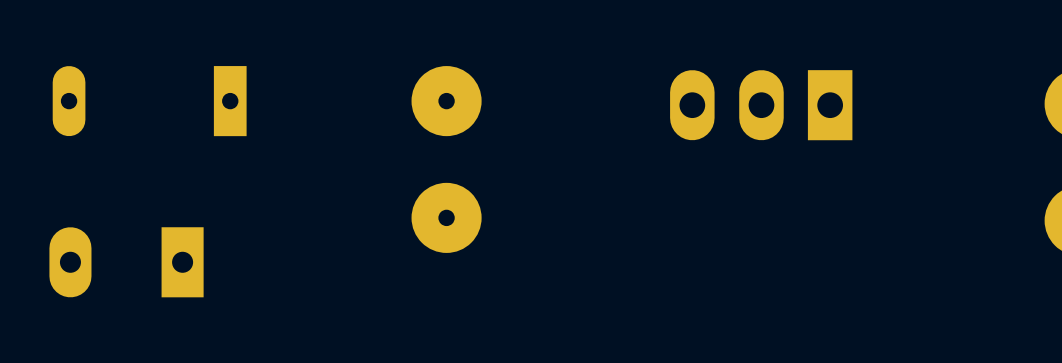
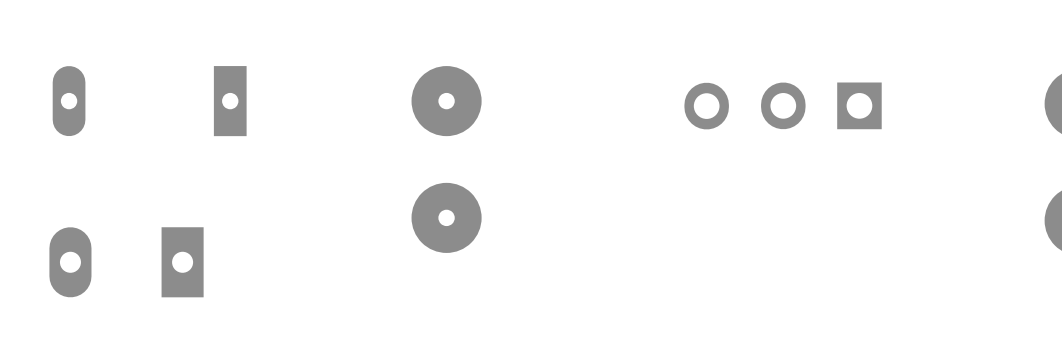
part footprint: [670, 70, 853, 141] -> [684, 82, 882, 130]

